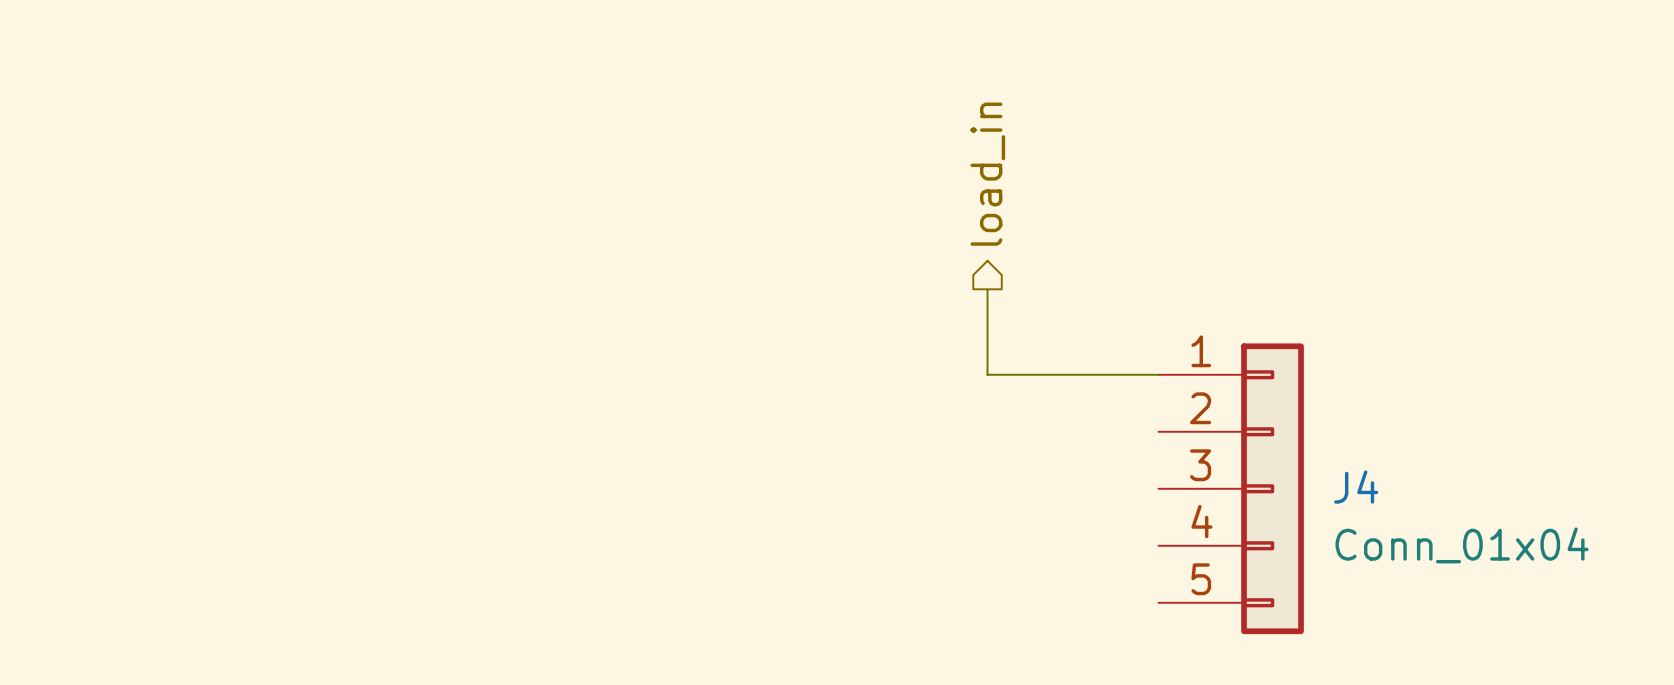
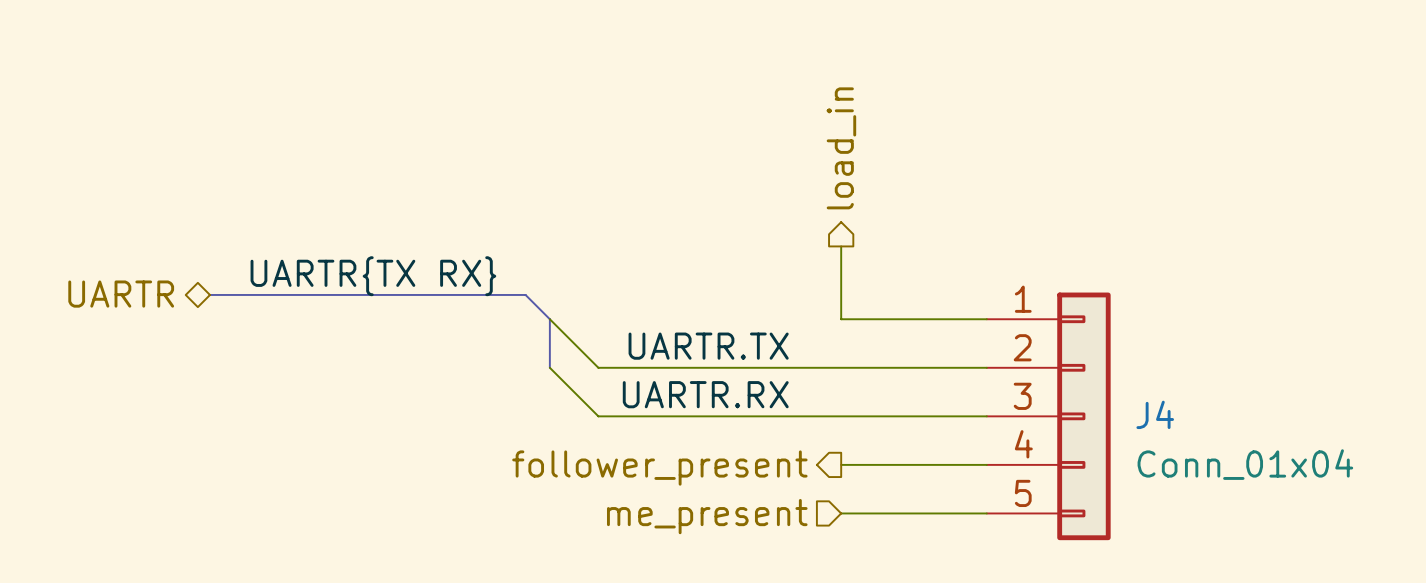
label: none -> UARTR{TX RX} (373, 276)
hierarchical label: none -> UARTR (121, 294)
bus: none -> (210, 294) (525, 294) (549, 319) (549, 367)
wire: none -> (549, 319) (598, 367) (986, 367)
label: none -> UARTR.TX (708, 346)
wire: none -> (549, 367) (598, 416) (986, 416)
label: none -> UARTR.RX (705, 394)
wire: none -> (841, 464) (986, 464)
hierarchical label: none -> follower_present (659, 468)
wire: none -> (841, 513) (986, 513)
hierarchical label: none -> me_present (707, 516)

